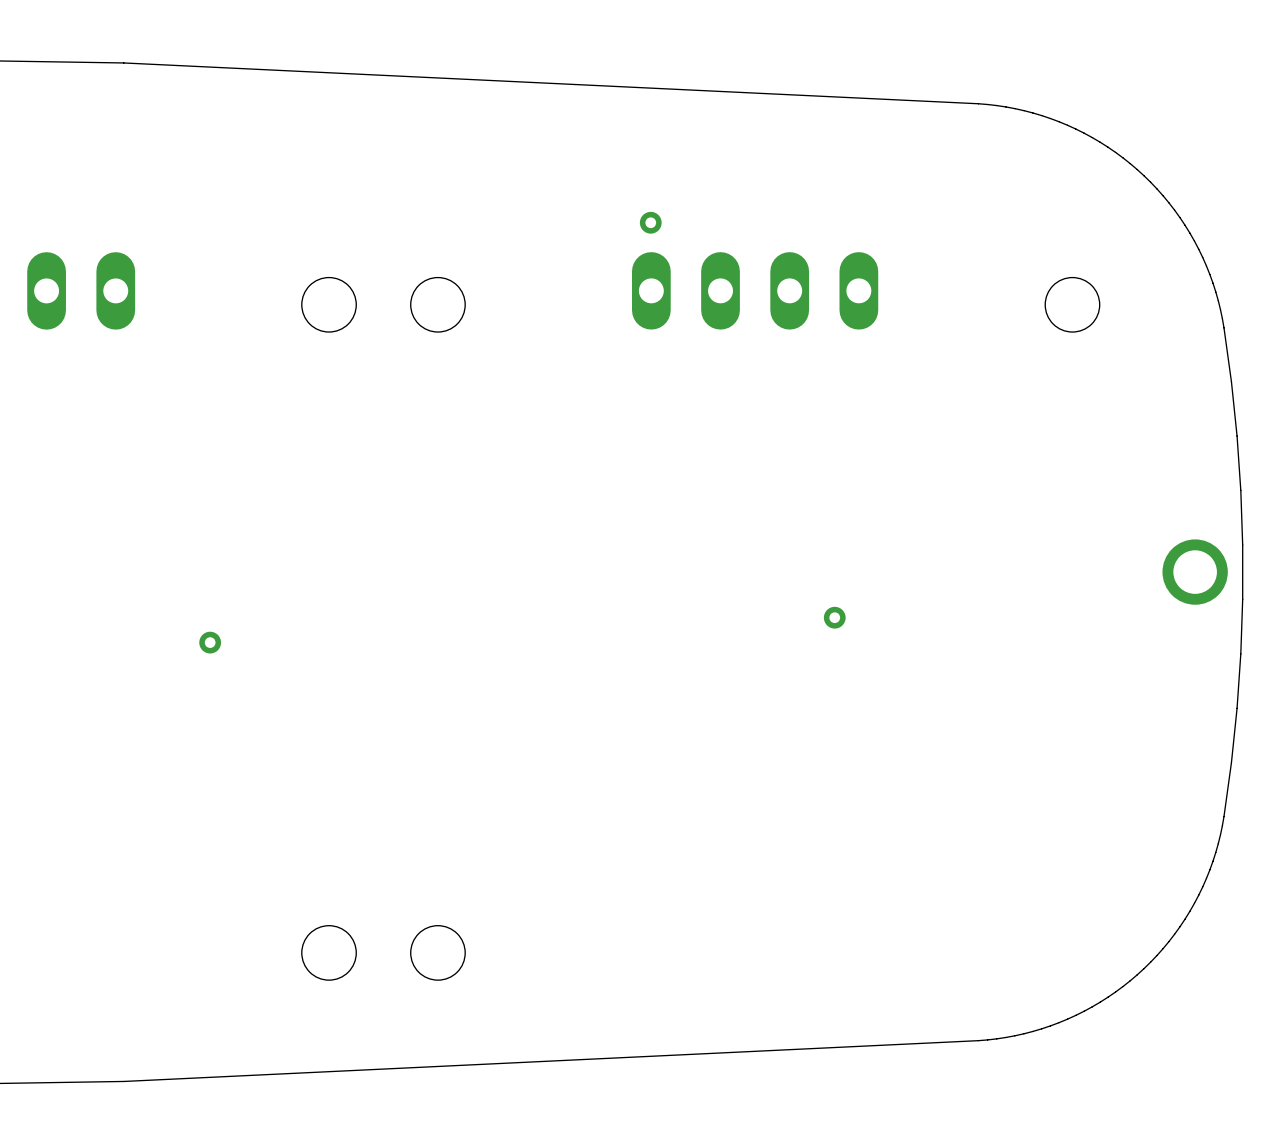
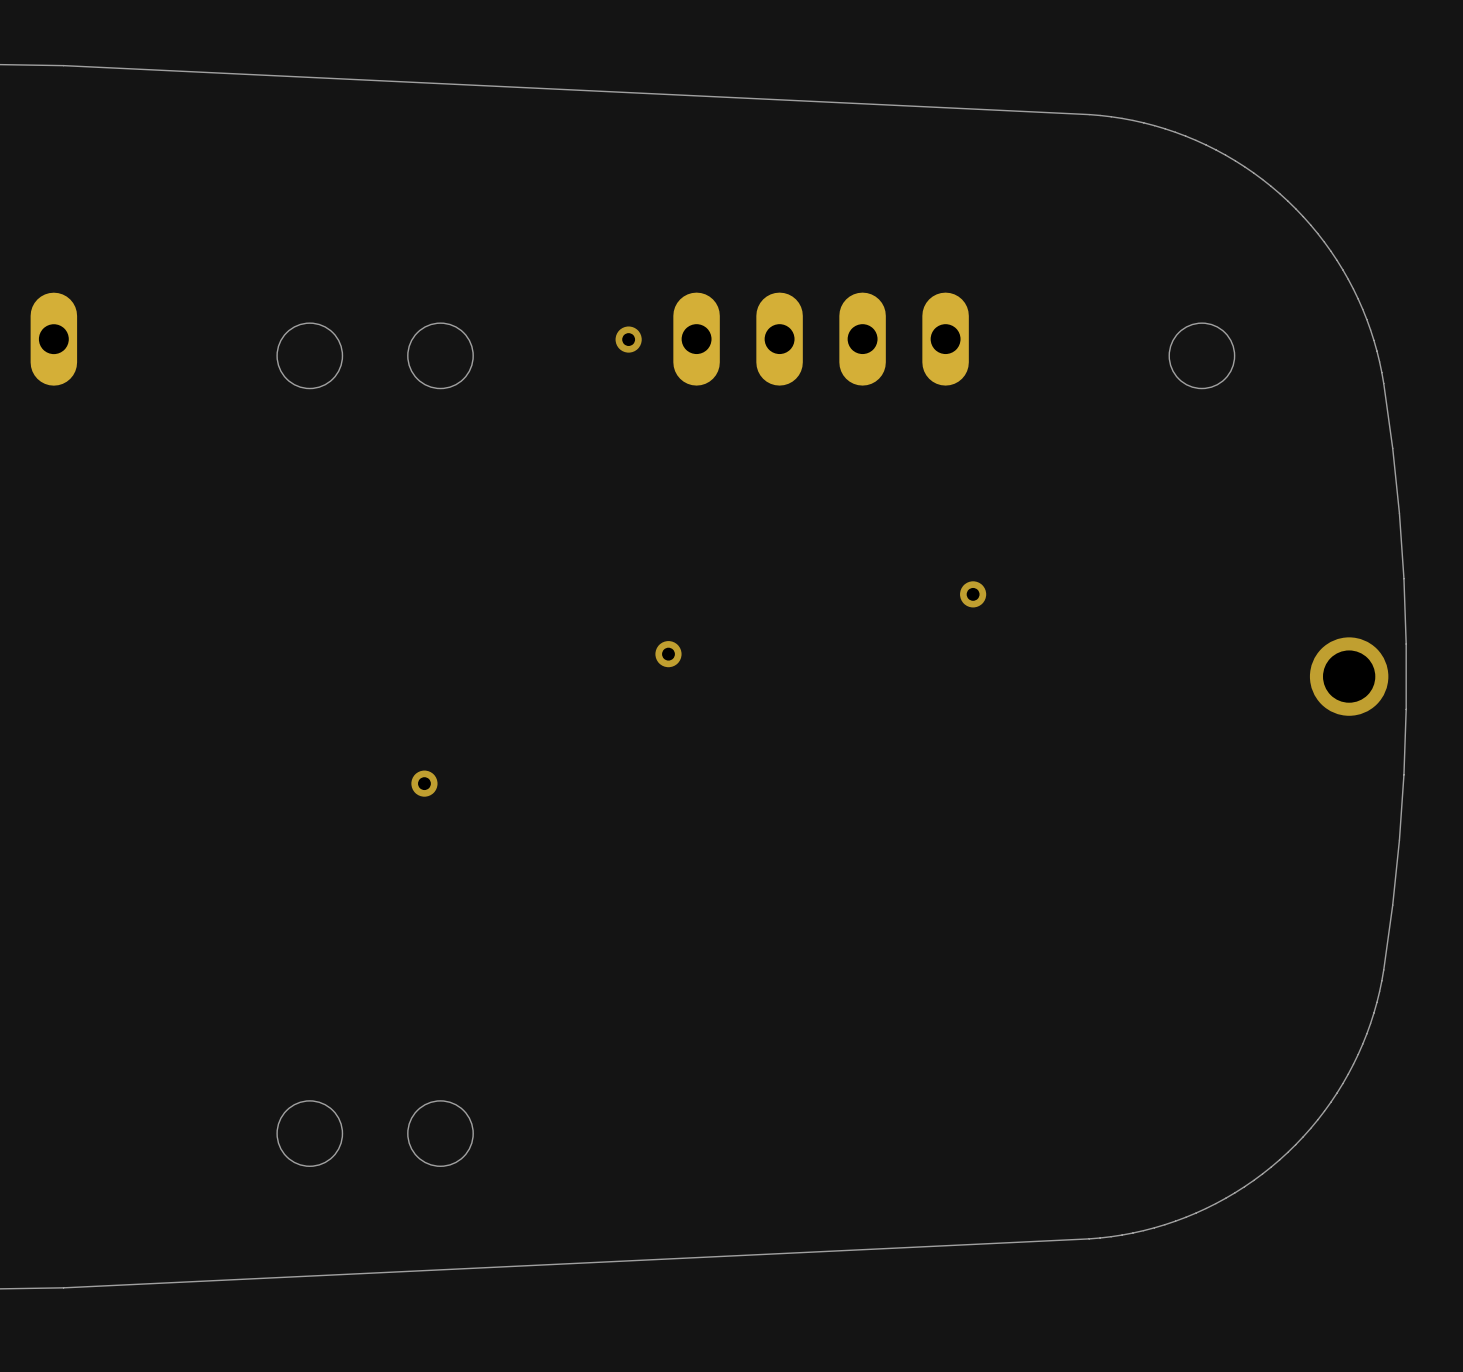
via position: (650, 222) -> (628, 339)
via: none -> (973, 594)
via: none -> (668, 654)
via: (834, 617) -> none
via: (210, 642) -> none
via: none -> (424, 783)

